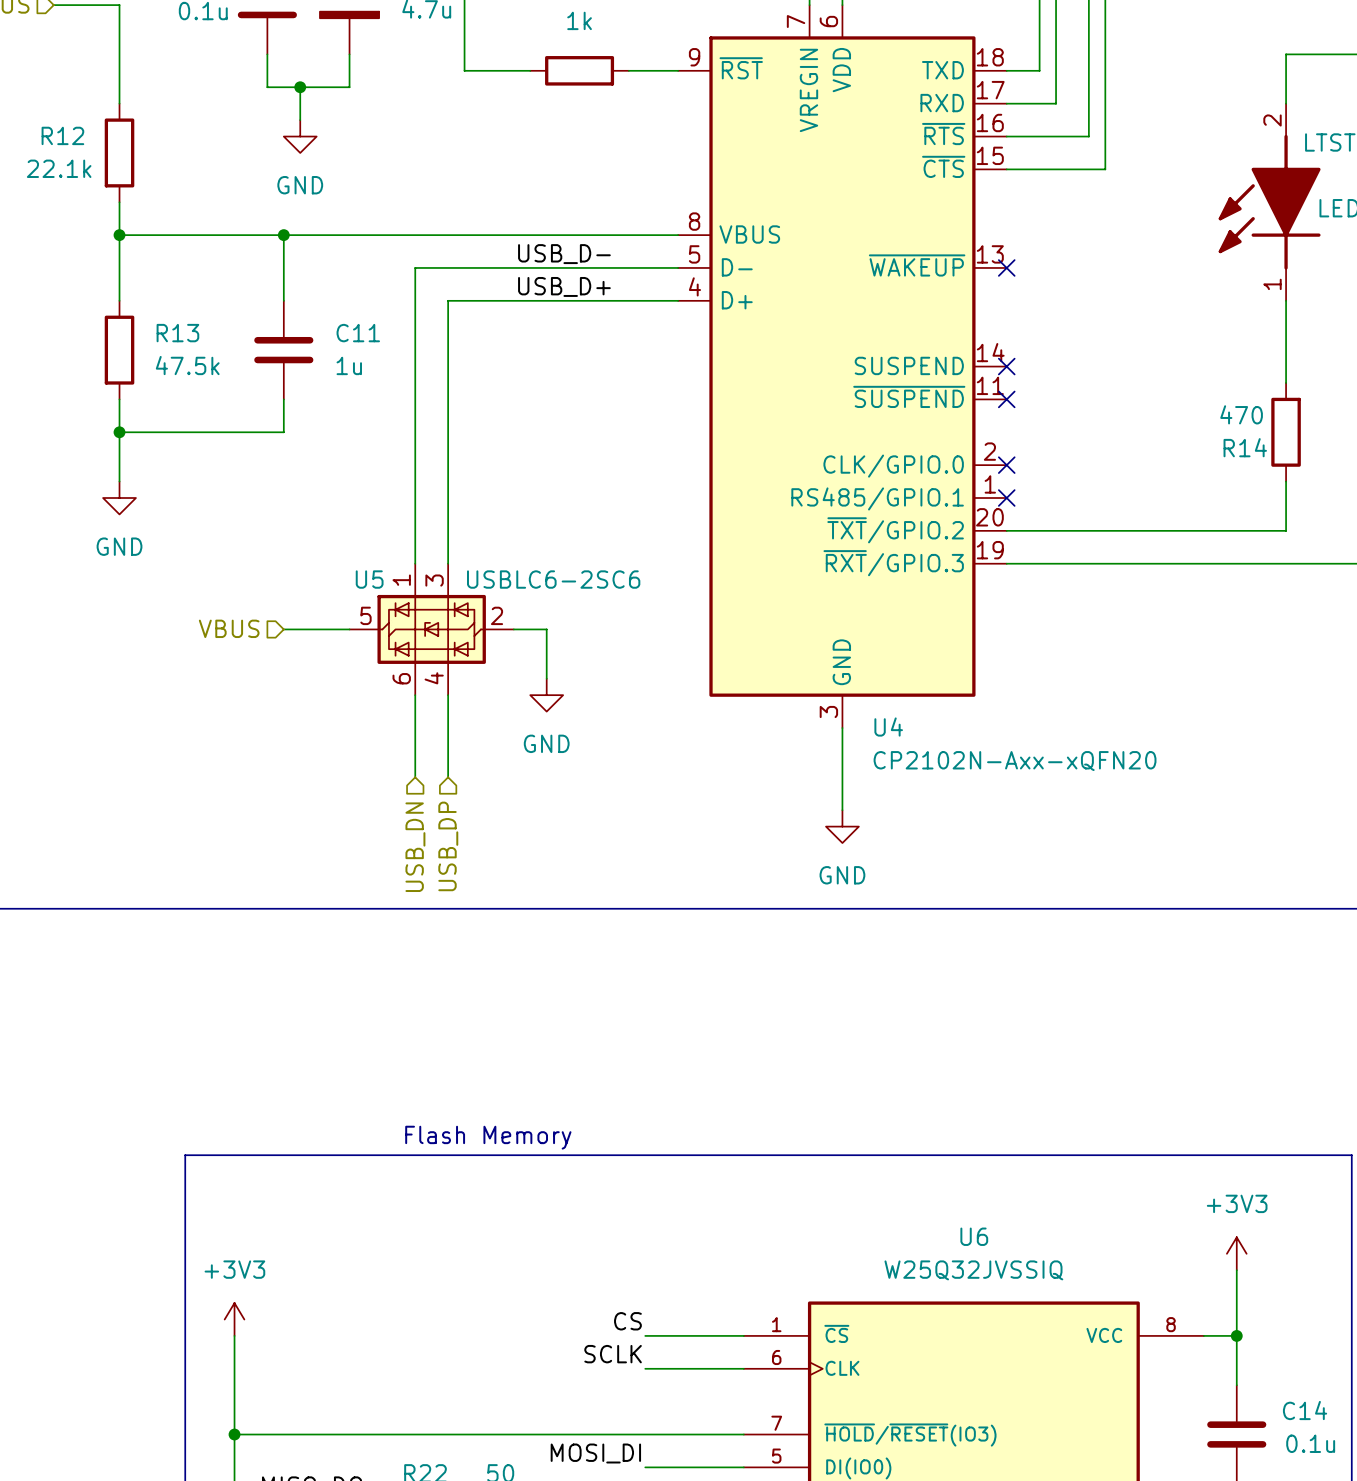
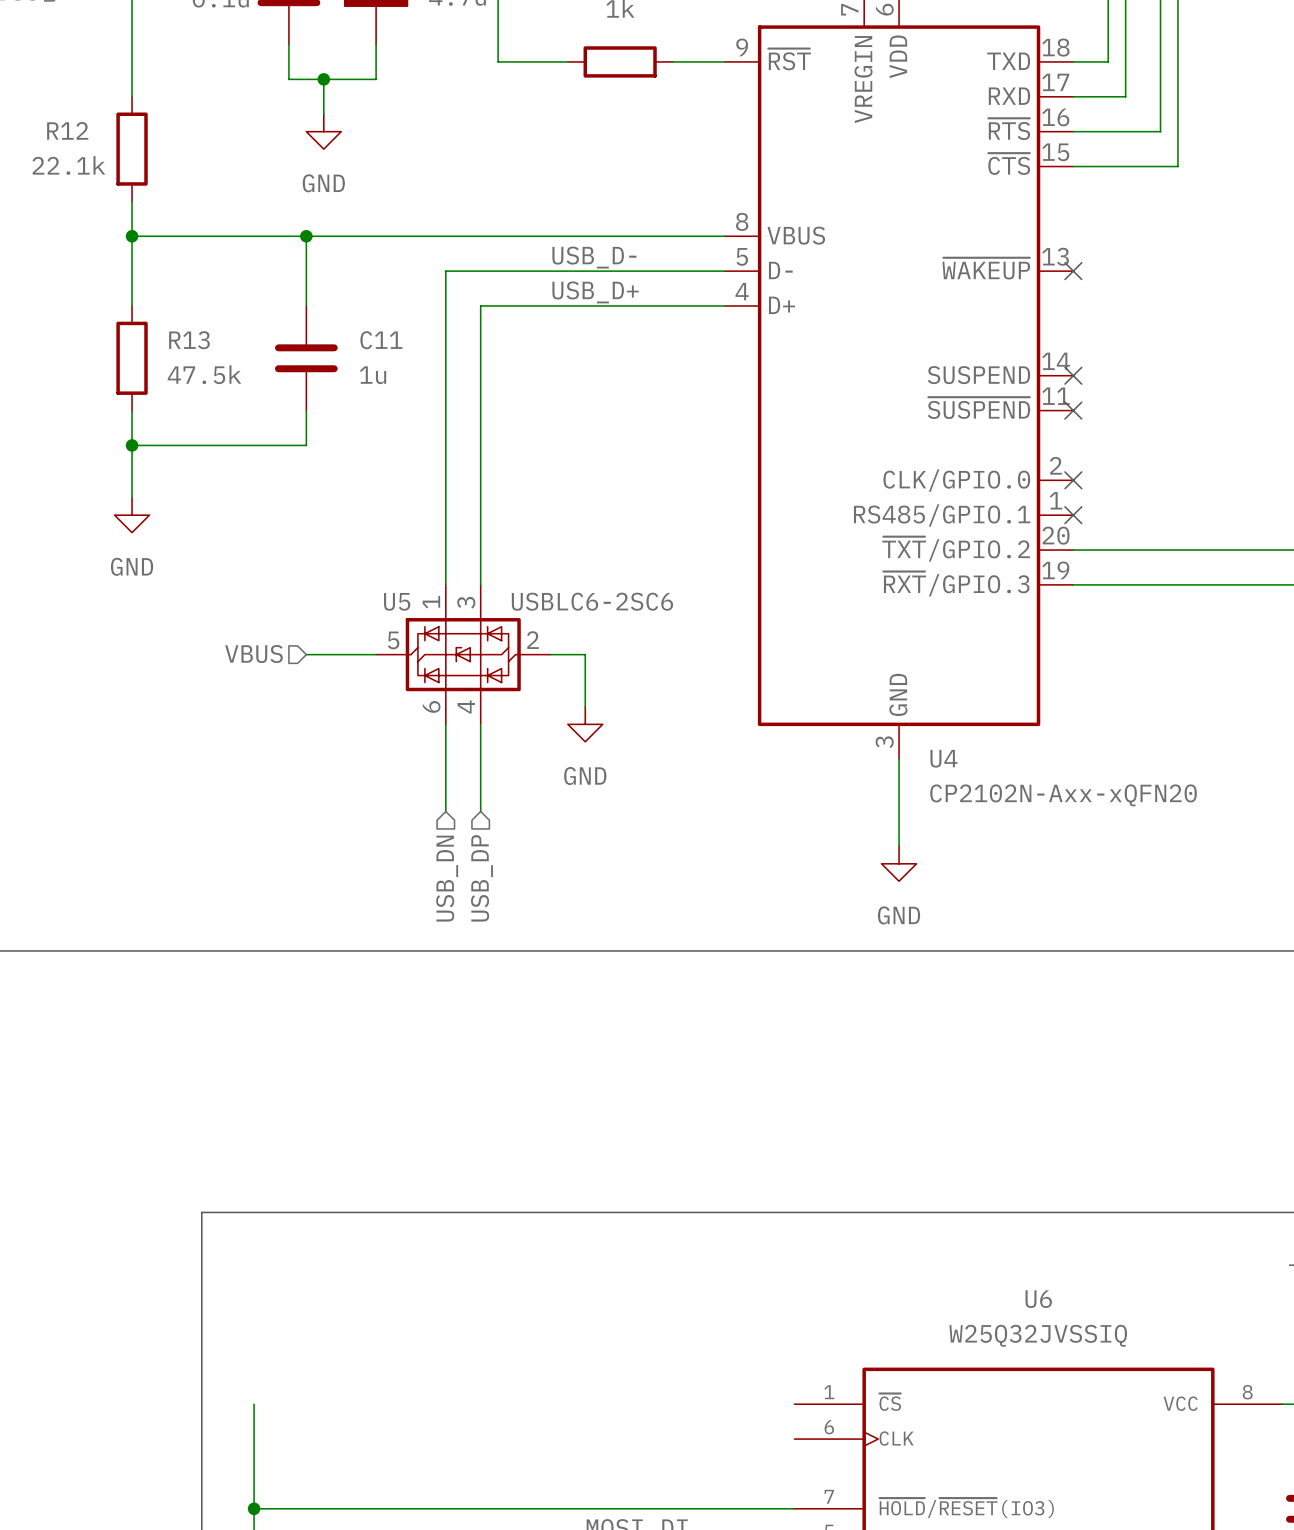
text: Flash Memory (488, 1137) -> none
power symbol: +3V3 (234, 1319) -> none
label: CS (627, 1321) -> none
wire: (645, 1335) (743, 1335) -> none
label: SCLK (613, 1354) -> none
wire: (645, 1368) (743, 1368) -> none

